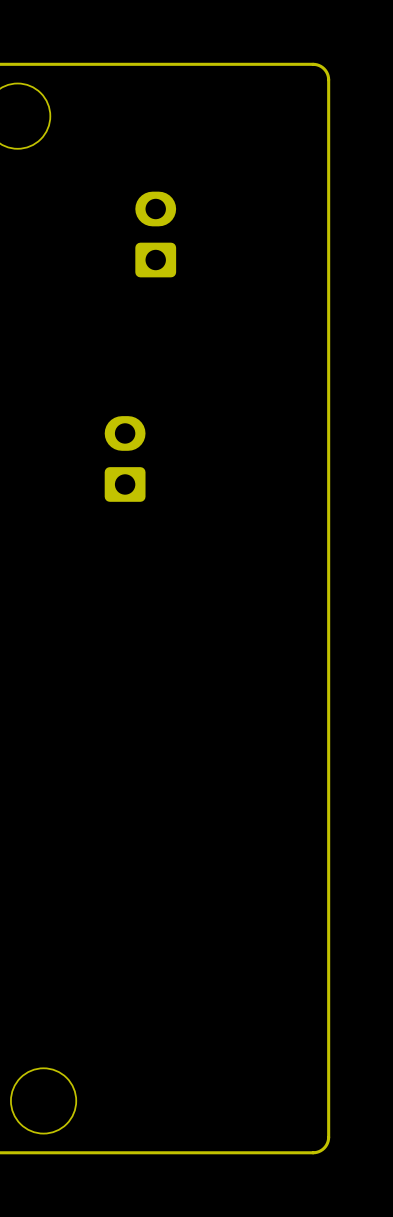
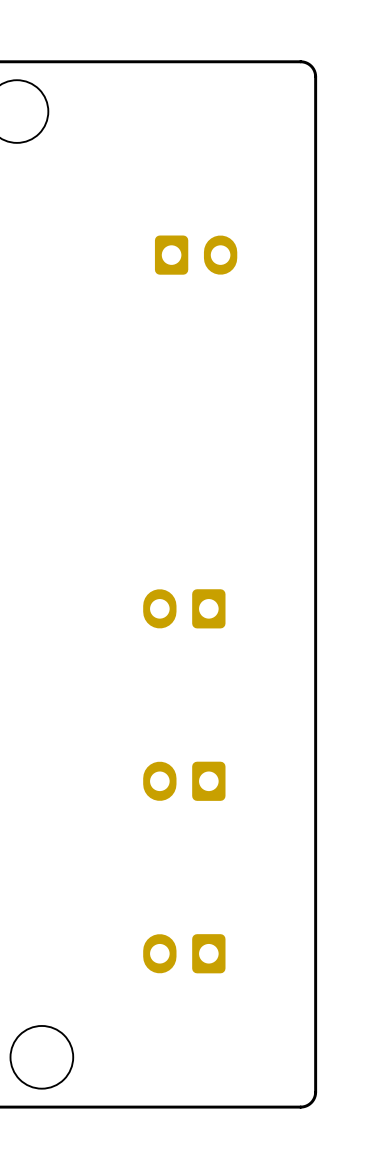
part rotation: 0° (155, 234) -> 90° clockwise (196, 255)
part position: (155, 234) -> (196, 255)
part: (125, 458) -> none
part: none -> (184, 608)
part: none -> (184, 781)
part: none -> (184, 953)

